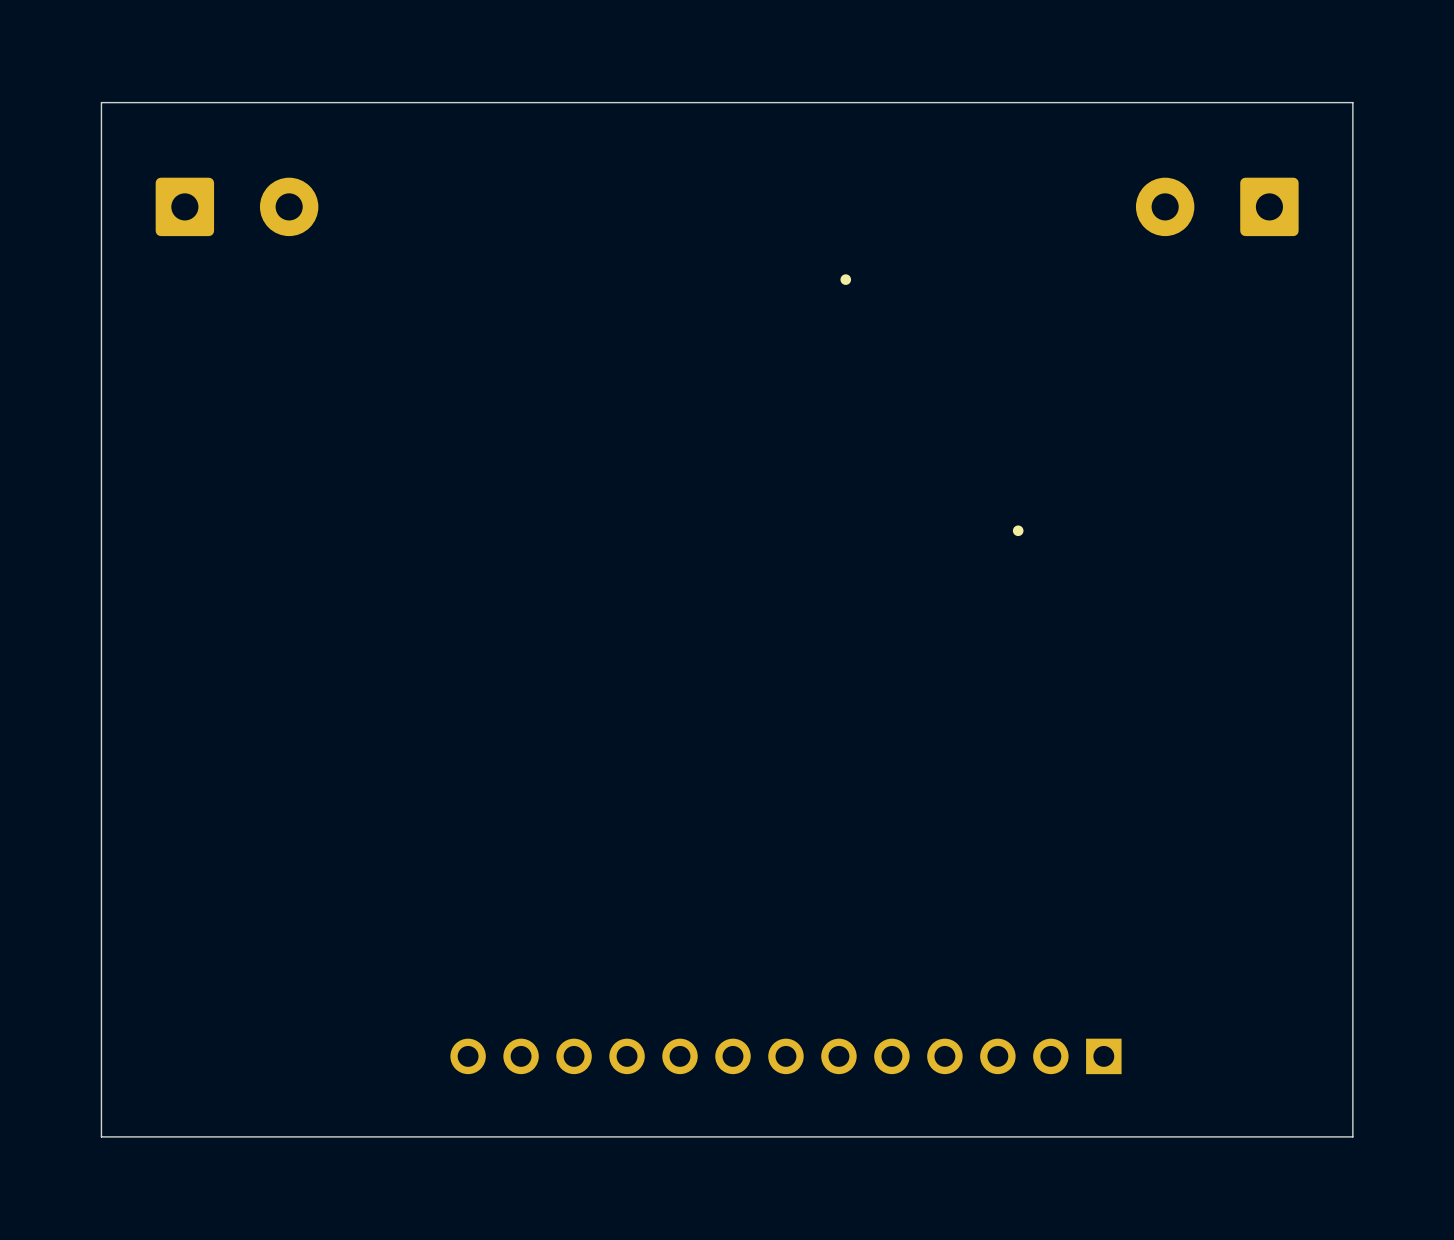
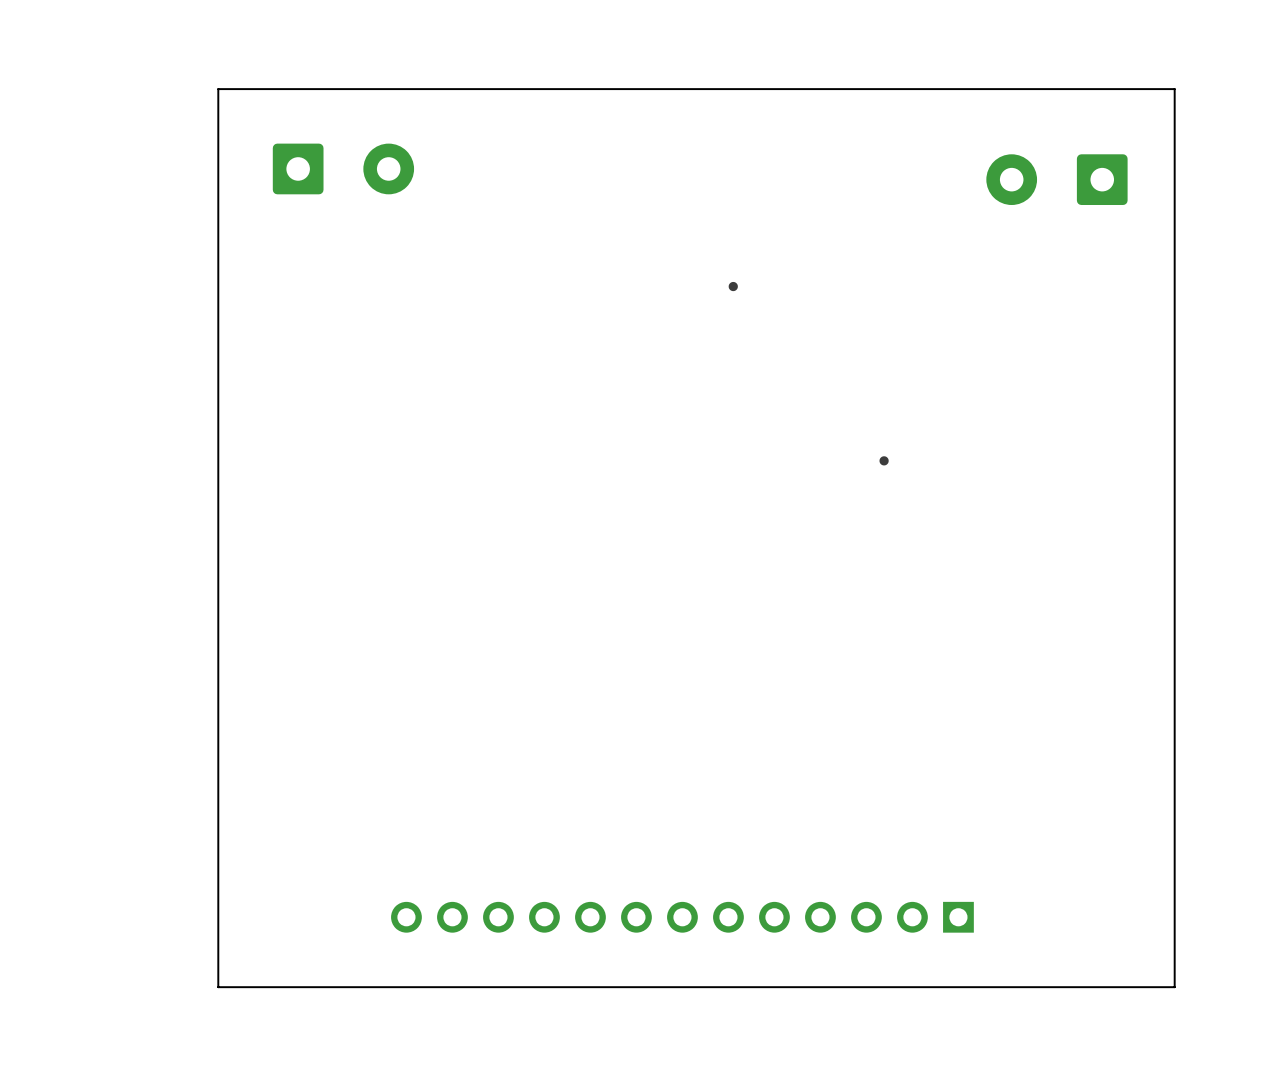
board edge: (251, 102) (101, 102) (101, 1136) (251, 1136) -> (218, 89) (218, 987)
part position: (237, 206) -> (343, 168)
part position: (845, 279) -> (733, 286)

